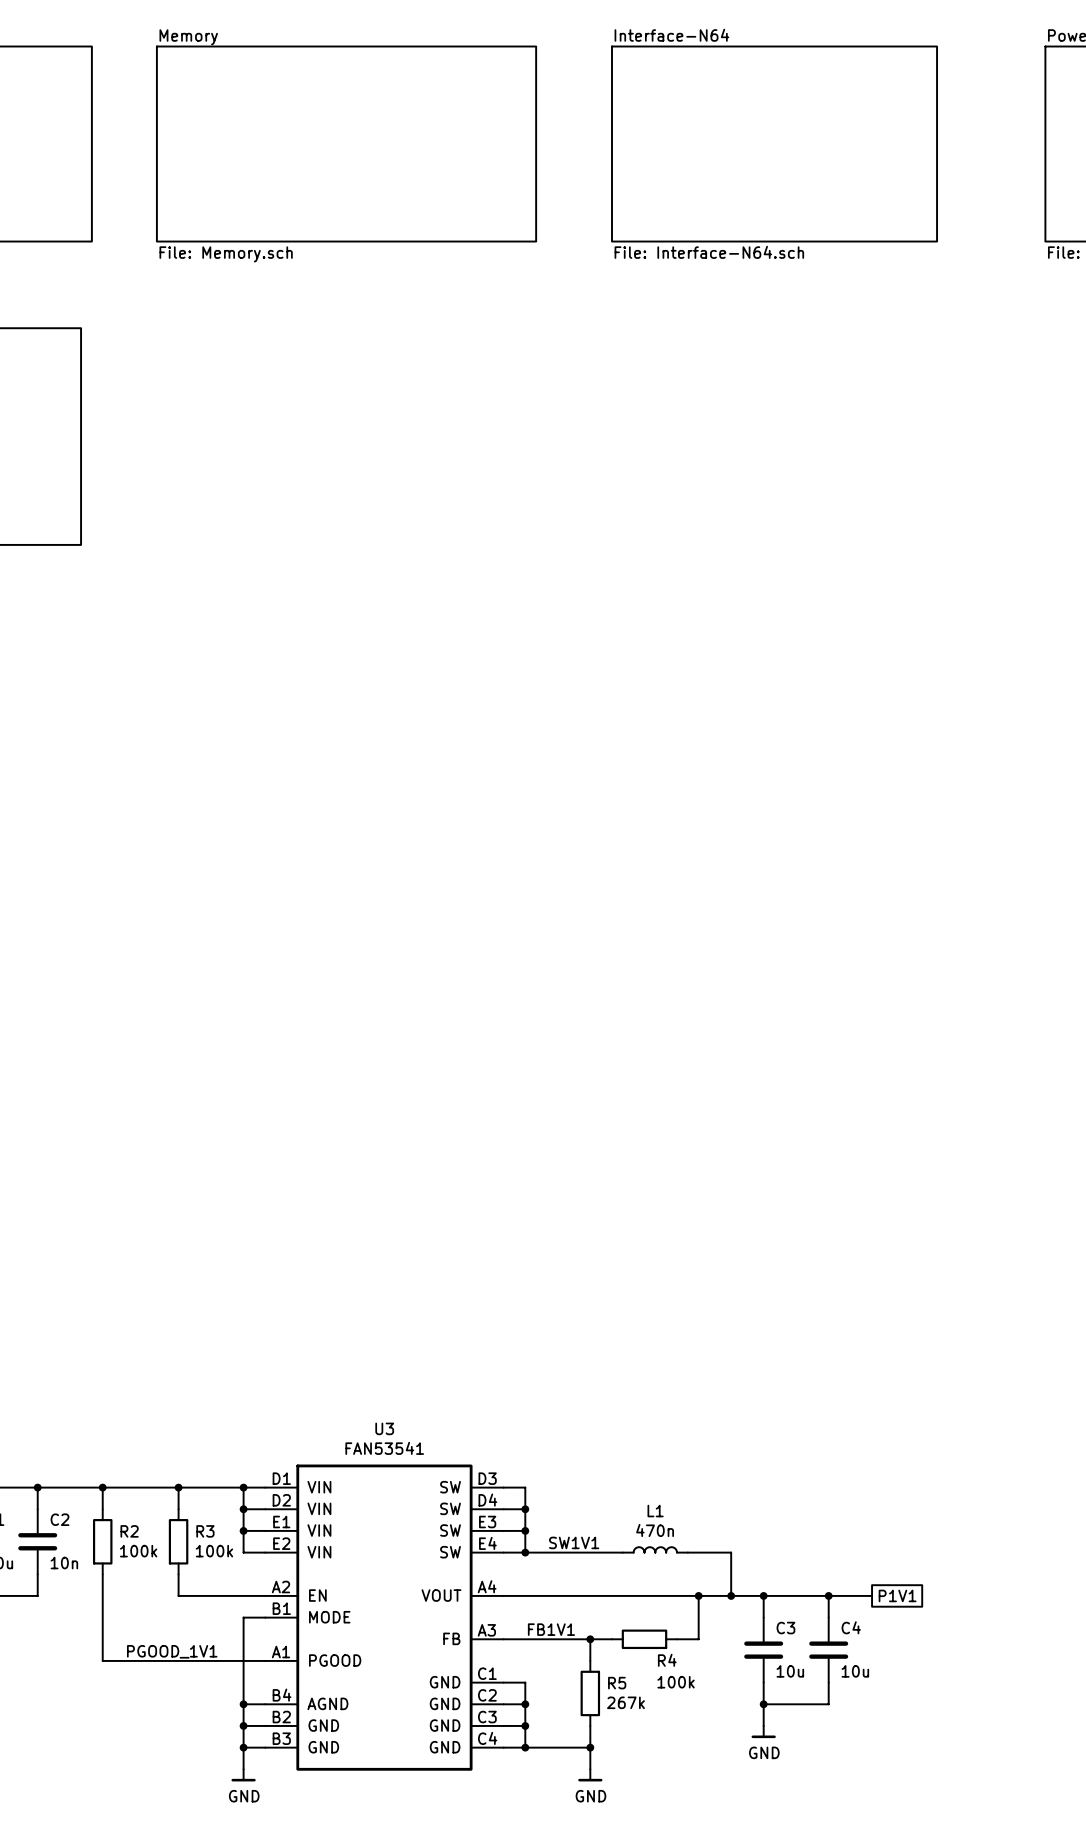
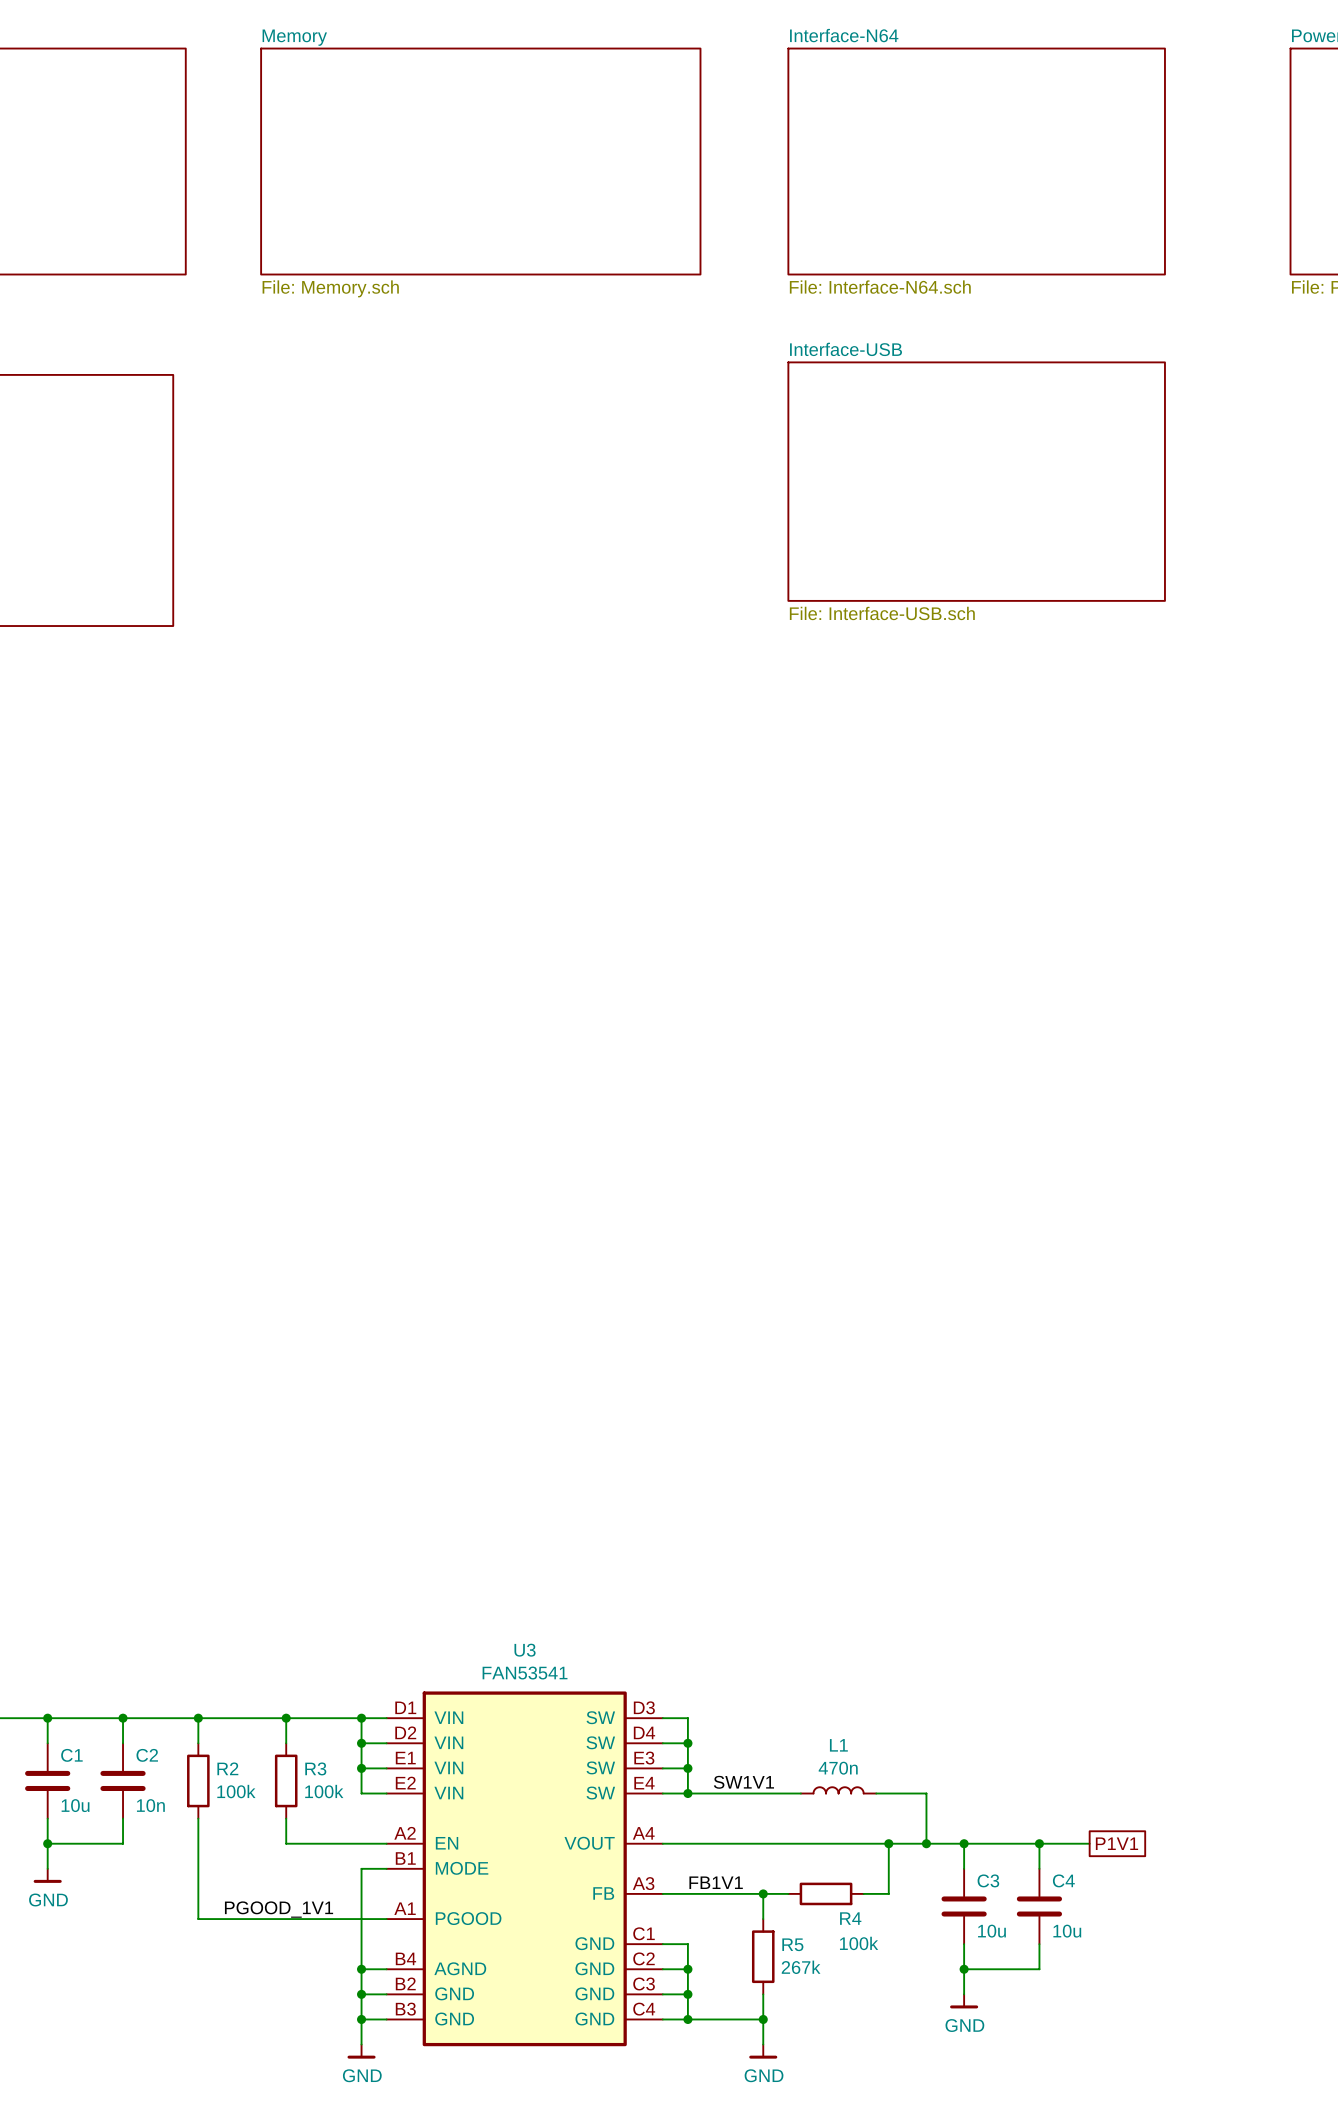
sheet Interface-USB: none -> File: Interface-USB.sch (976, 481)

